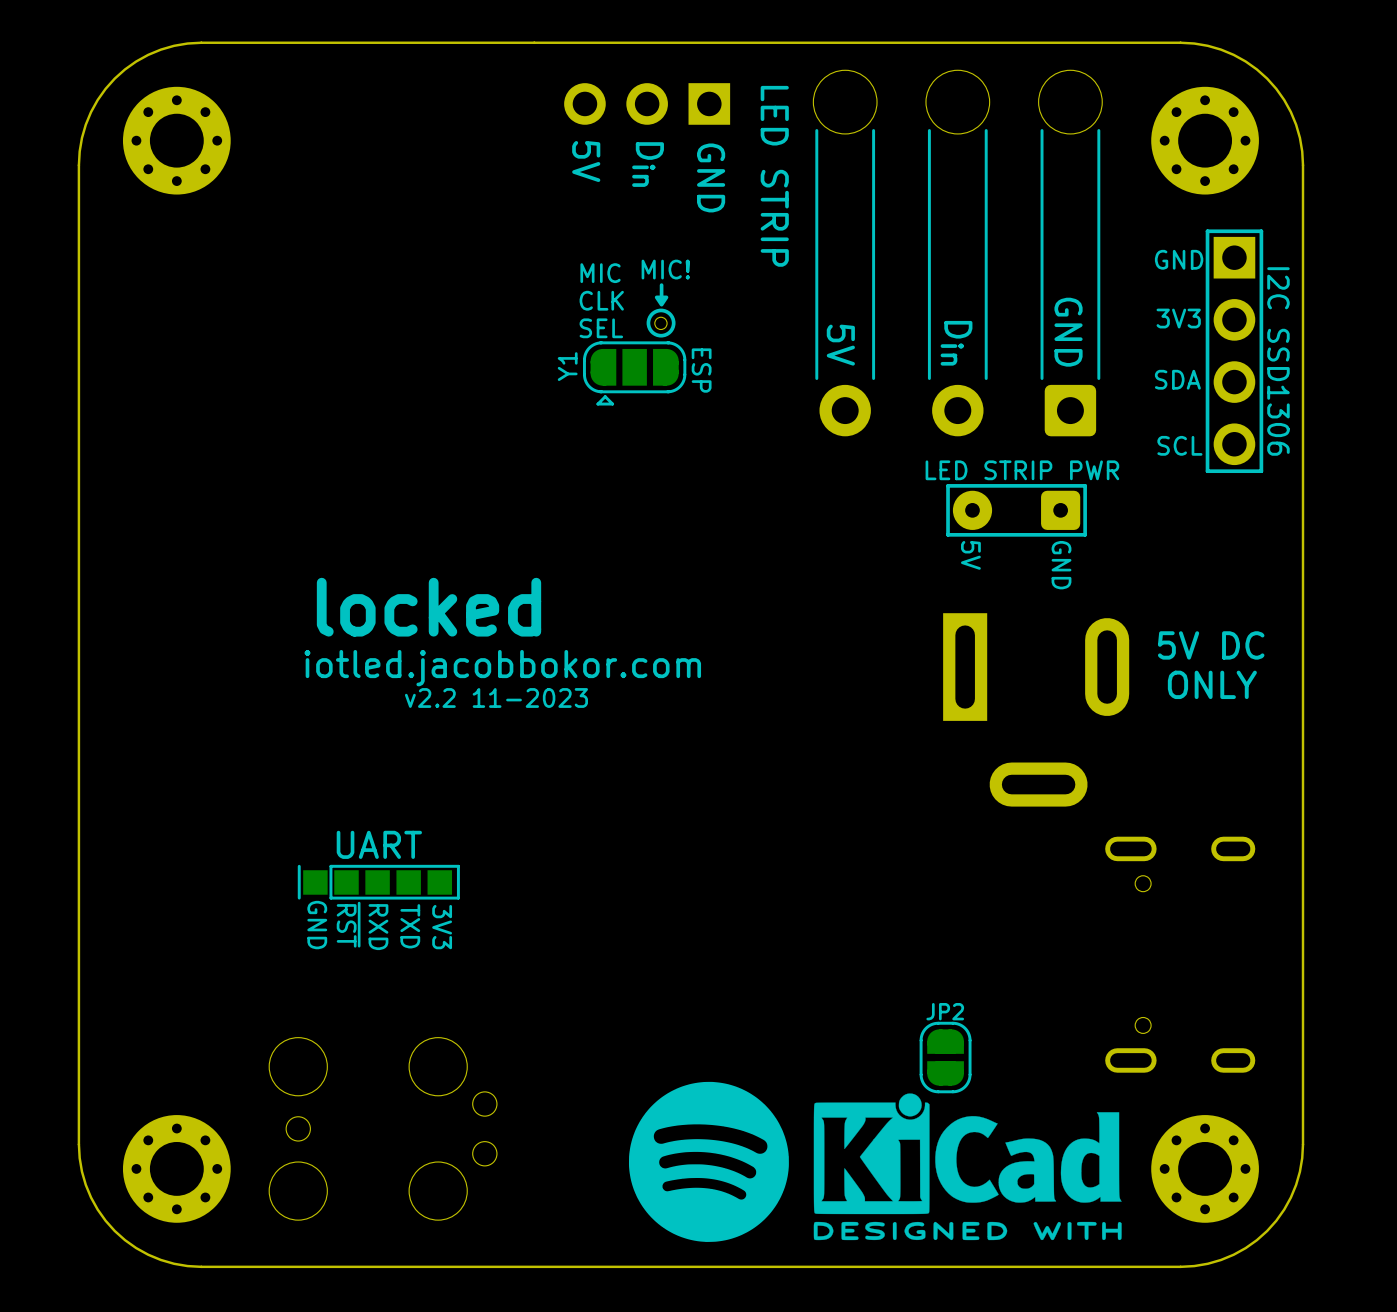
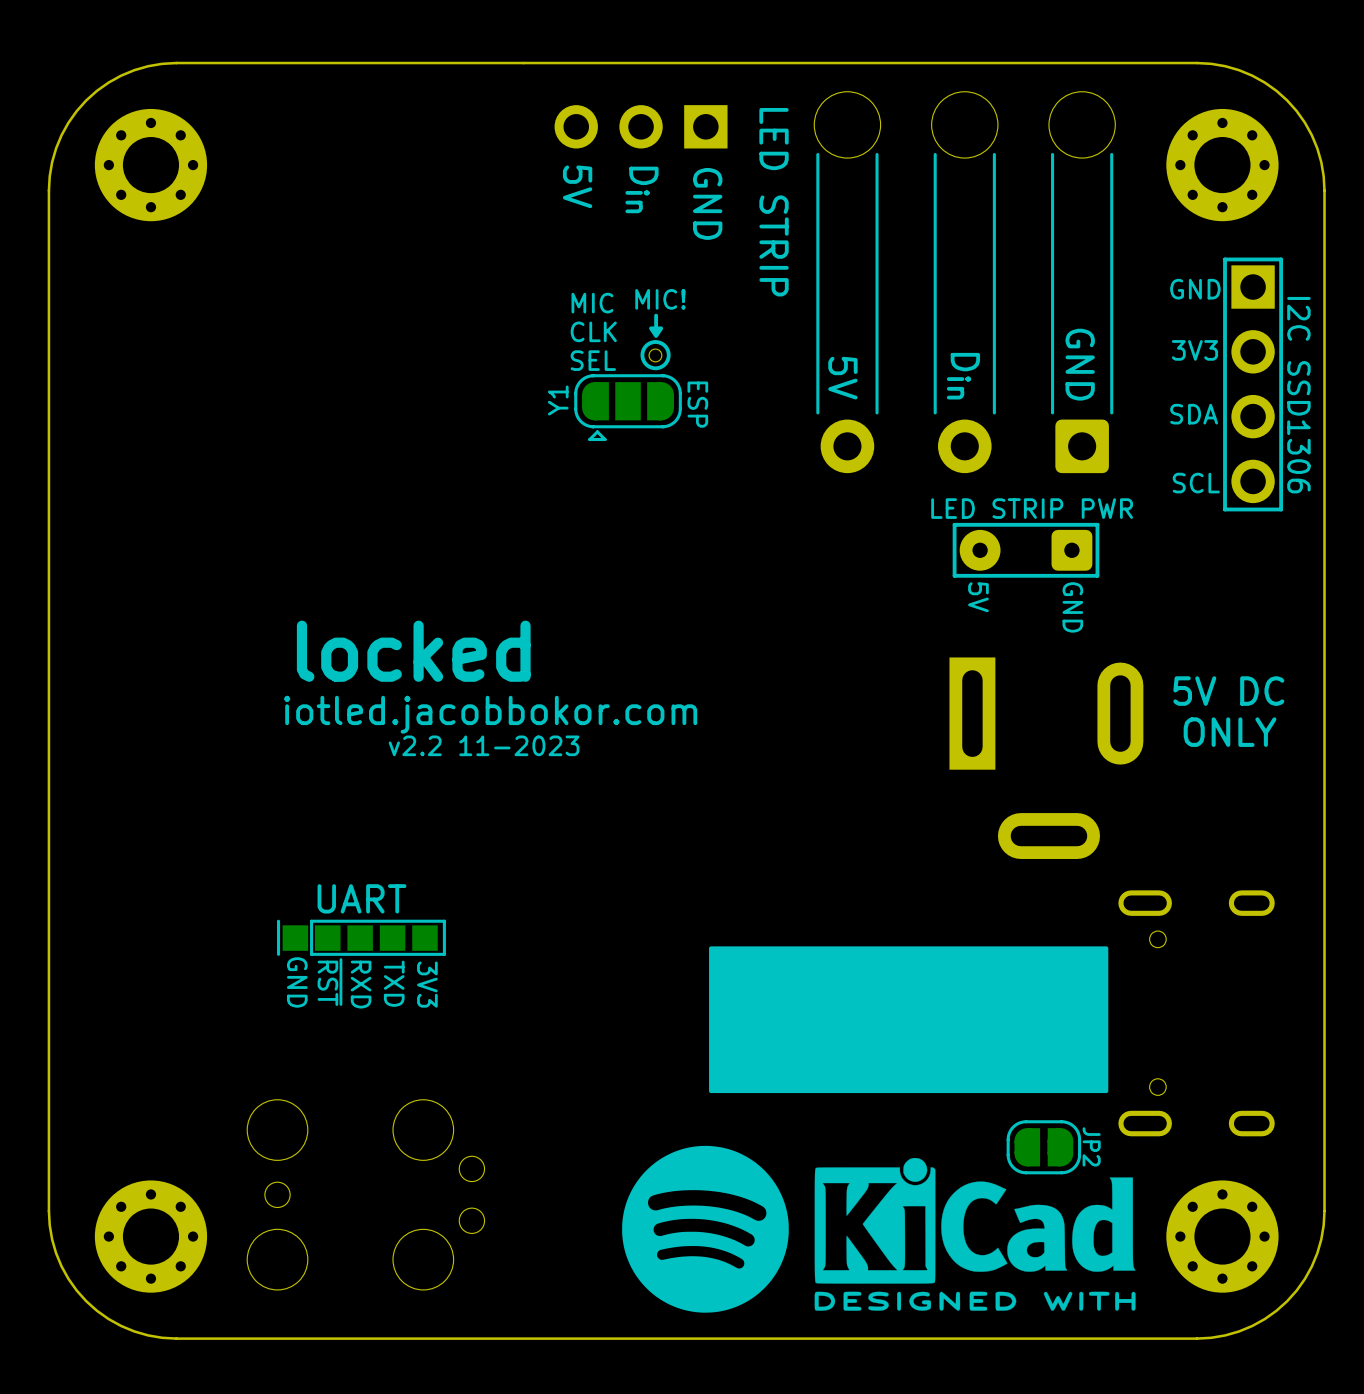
drawing: none -> [709, 946, 1109, 1094]
JP2 rotation: 0° (945, 1057) -> 90° clockwise (1043, 1147)
JP2 position: (945, 1057) -> (1043, 1147)

